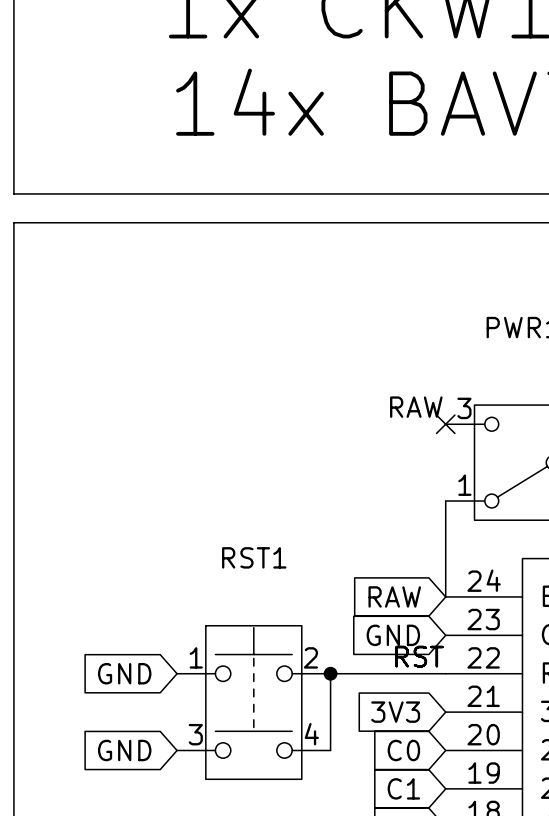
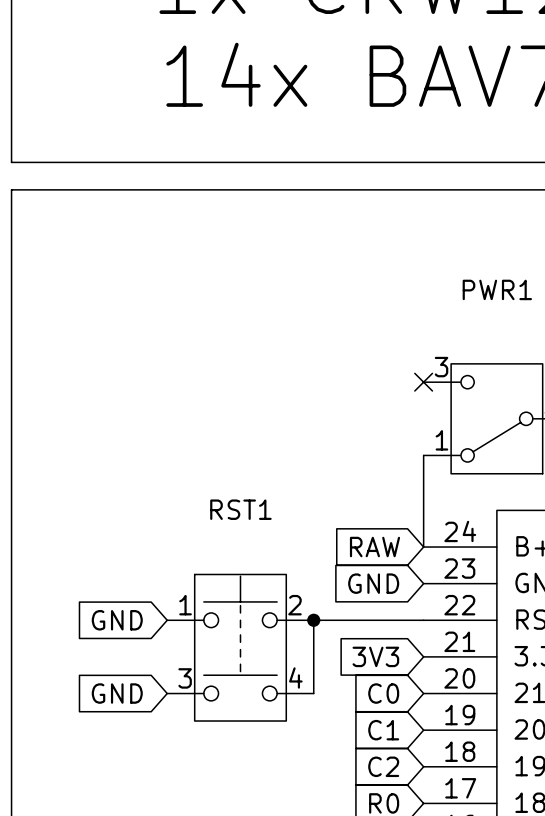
label: RAW (416, 407) -> none
label: RST (419, 656) -> none

